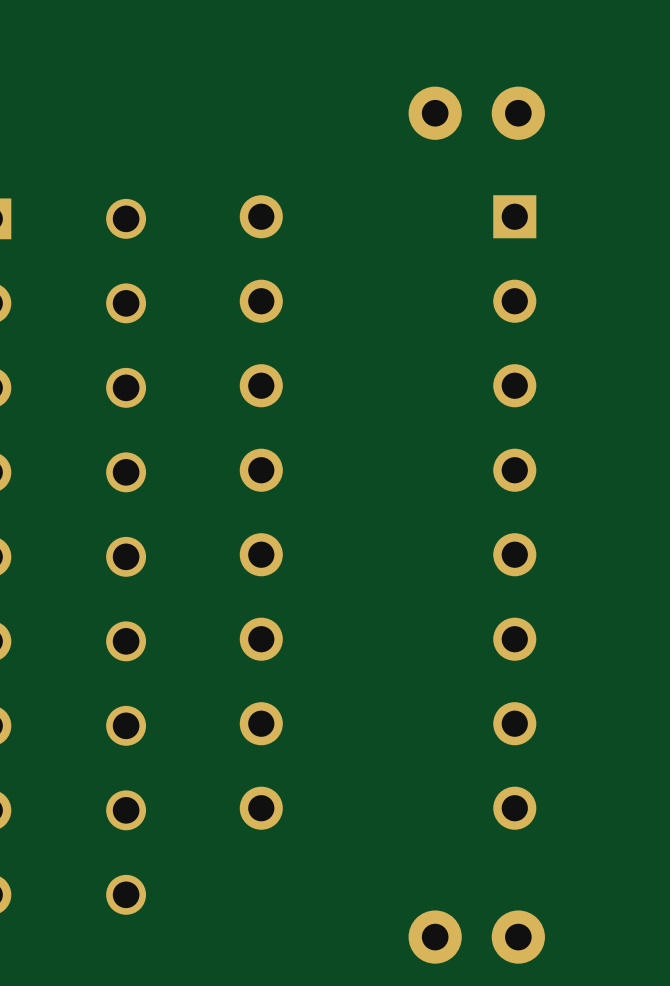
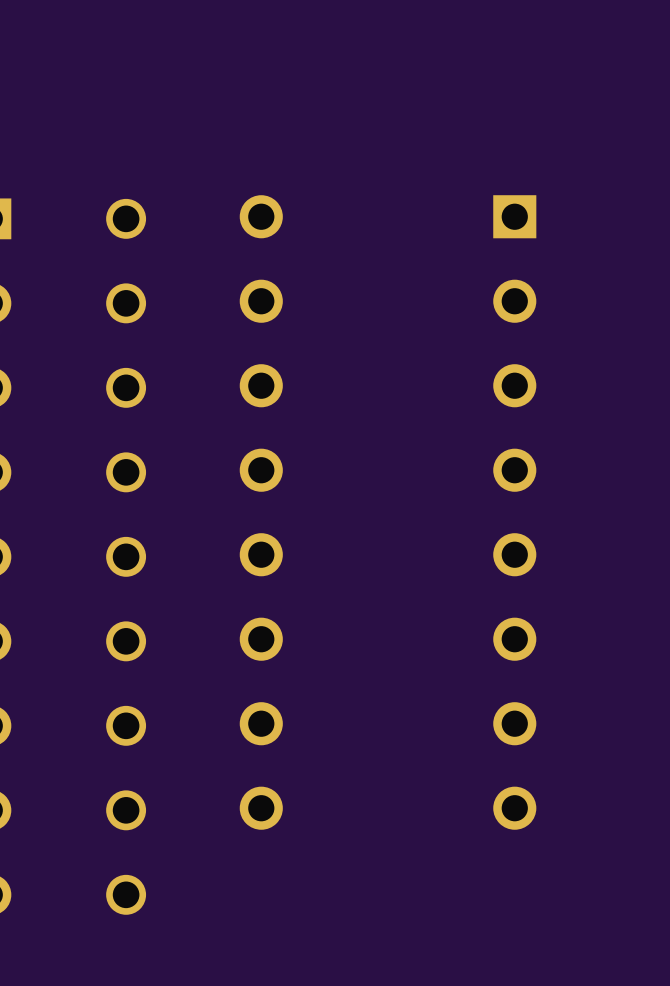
part: (476, 113) -> none
part: (476, 937) -> none

